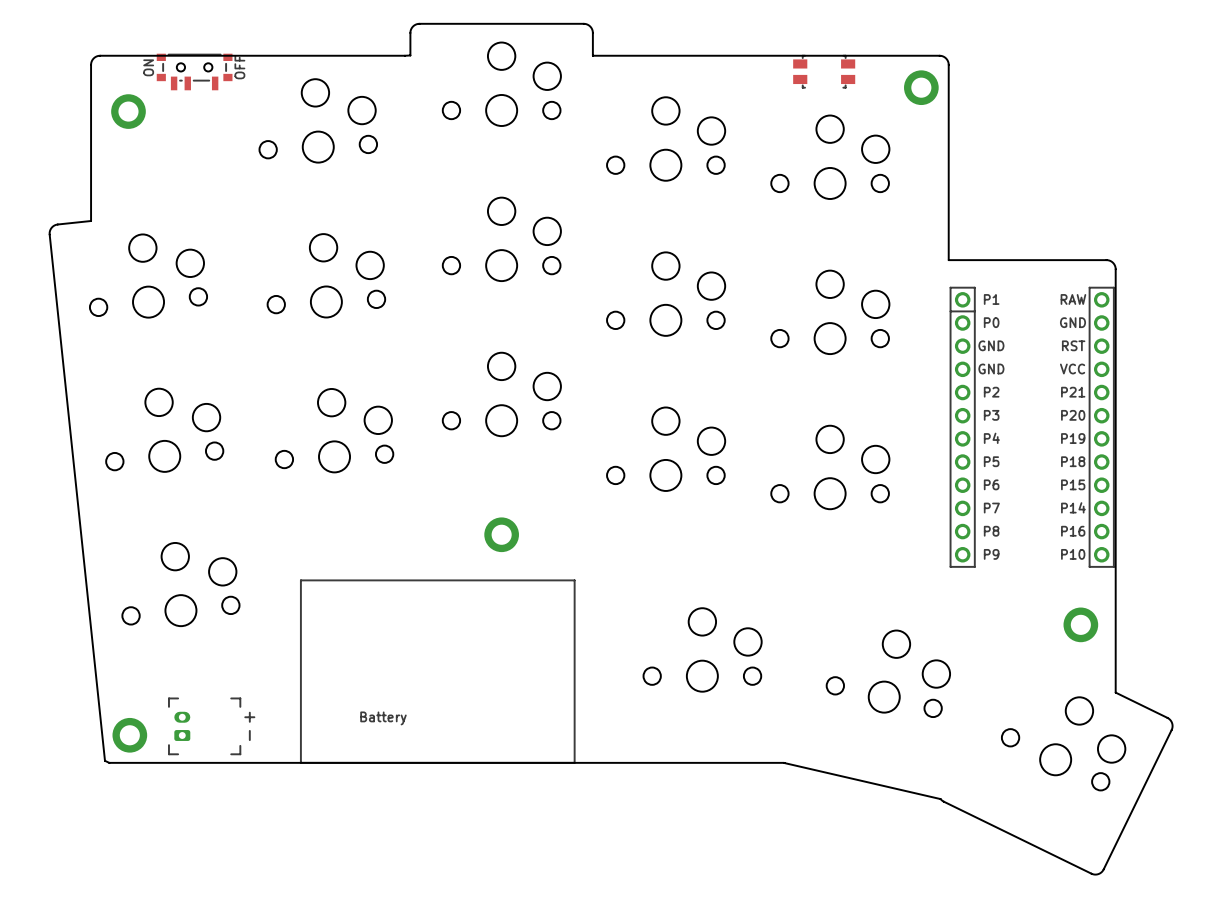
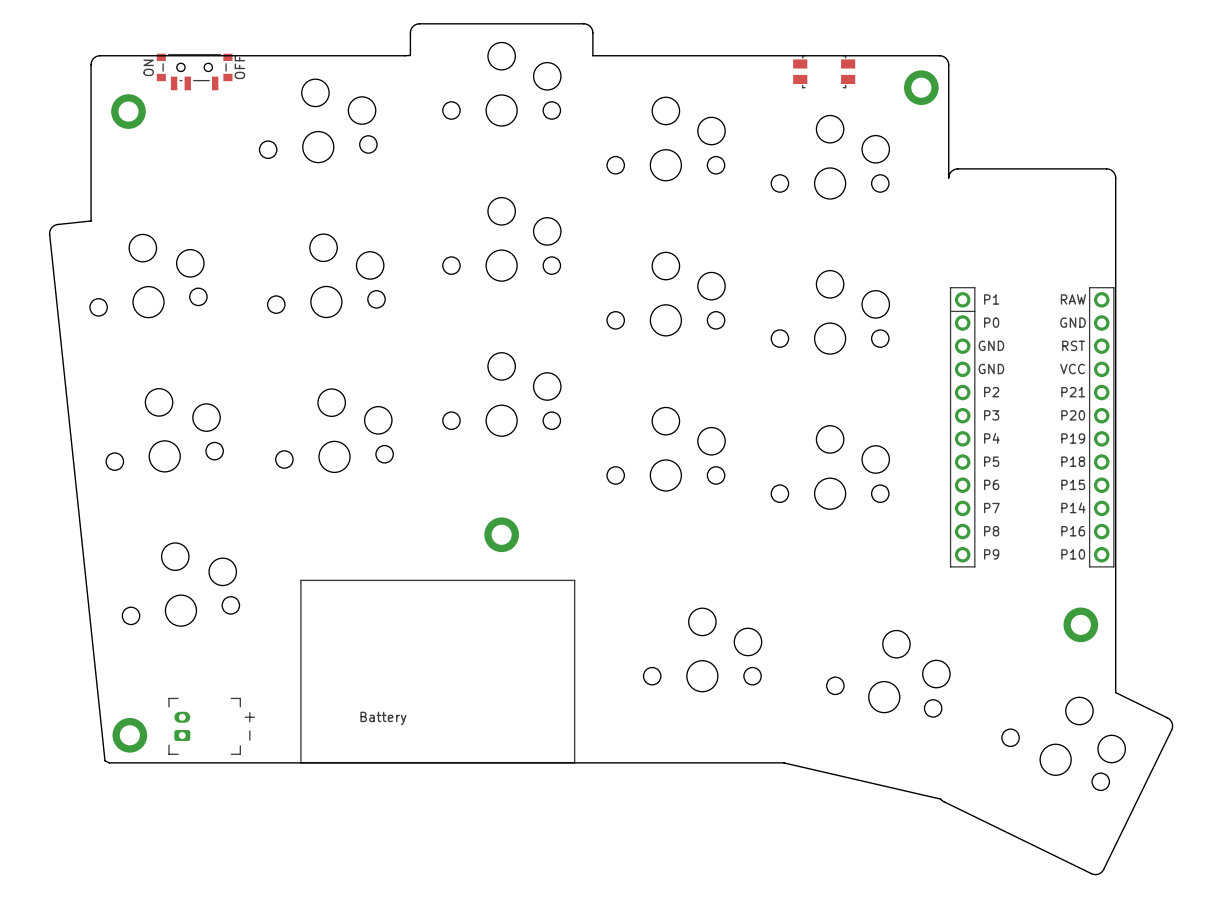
board edge: (948, 178) (948, 260) (1106, 260) (1113, 262) (1115, 269) -> (948, 178) (951, 171) (957, 168) (1110, 169) (1115, 178) (1115, 269)

